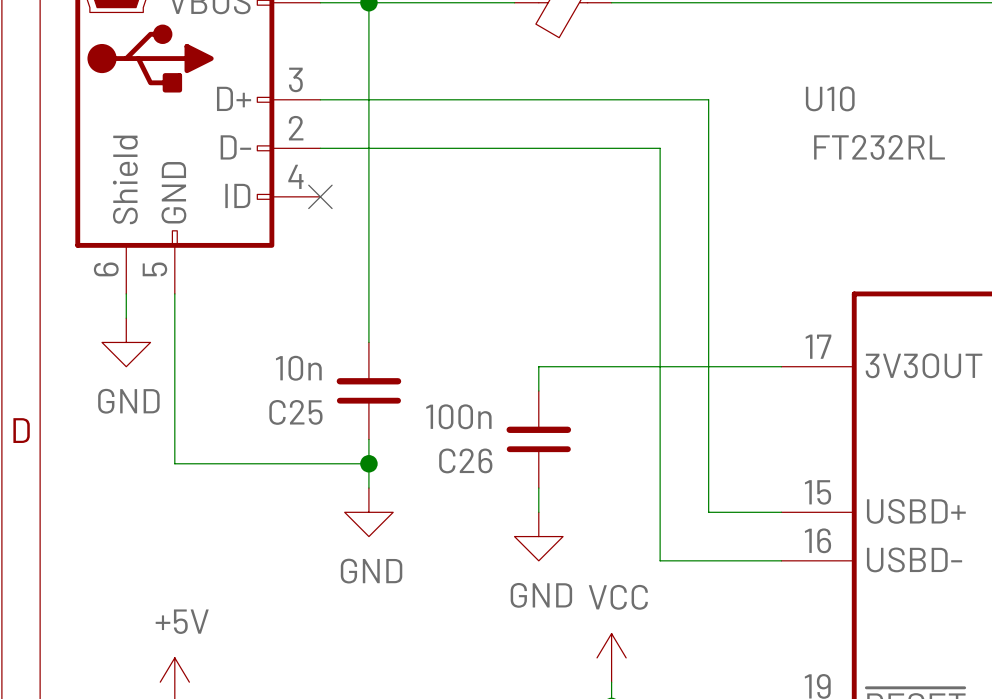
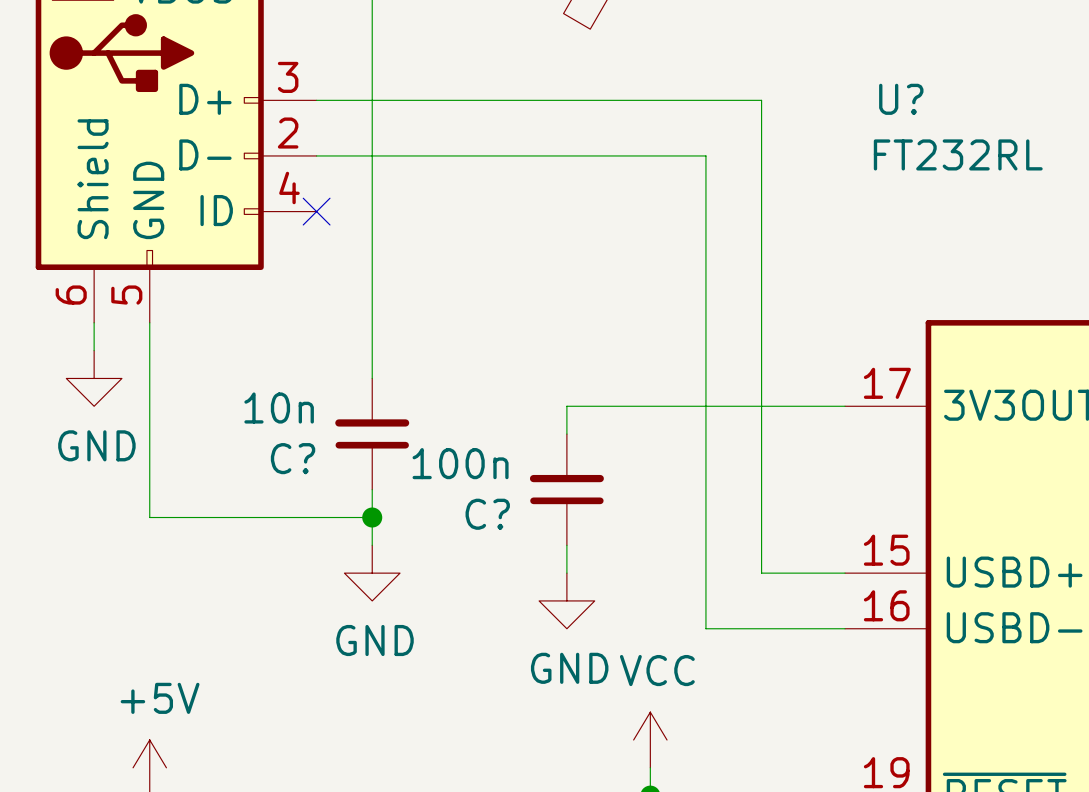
U10 name: U10 (830, 98) -> U? (901, 99)
C25 name: C25 (295, 412) -> C? (293, 458)
C26 name: C26 (465, 460) -> C? (487, 514)

